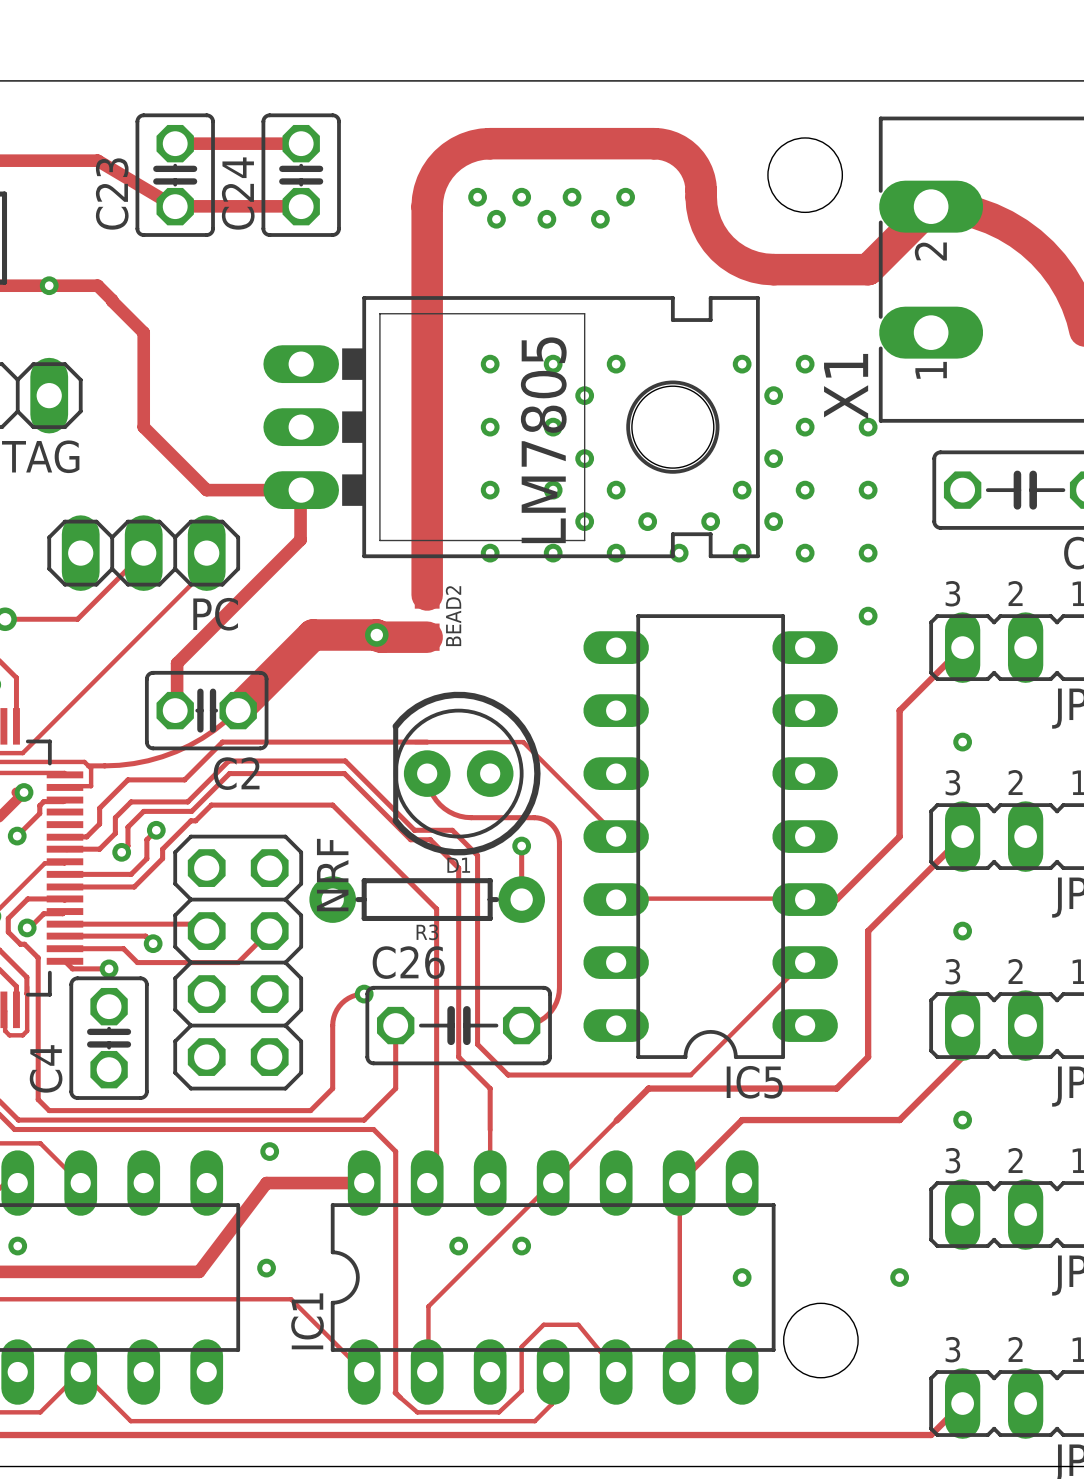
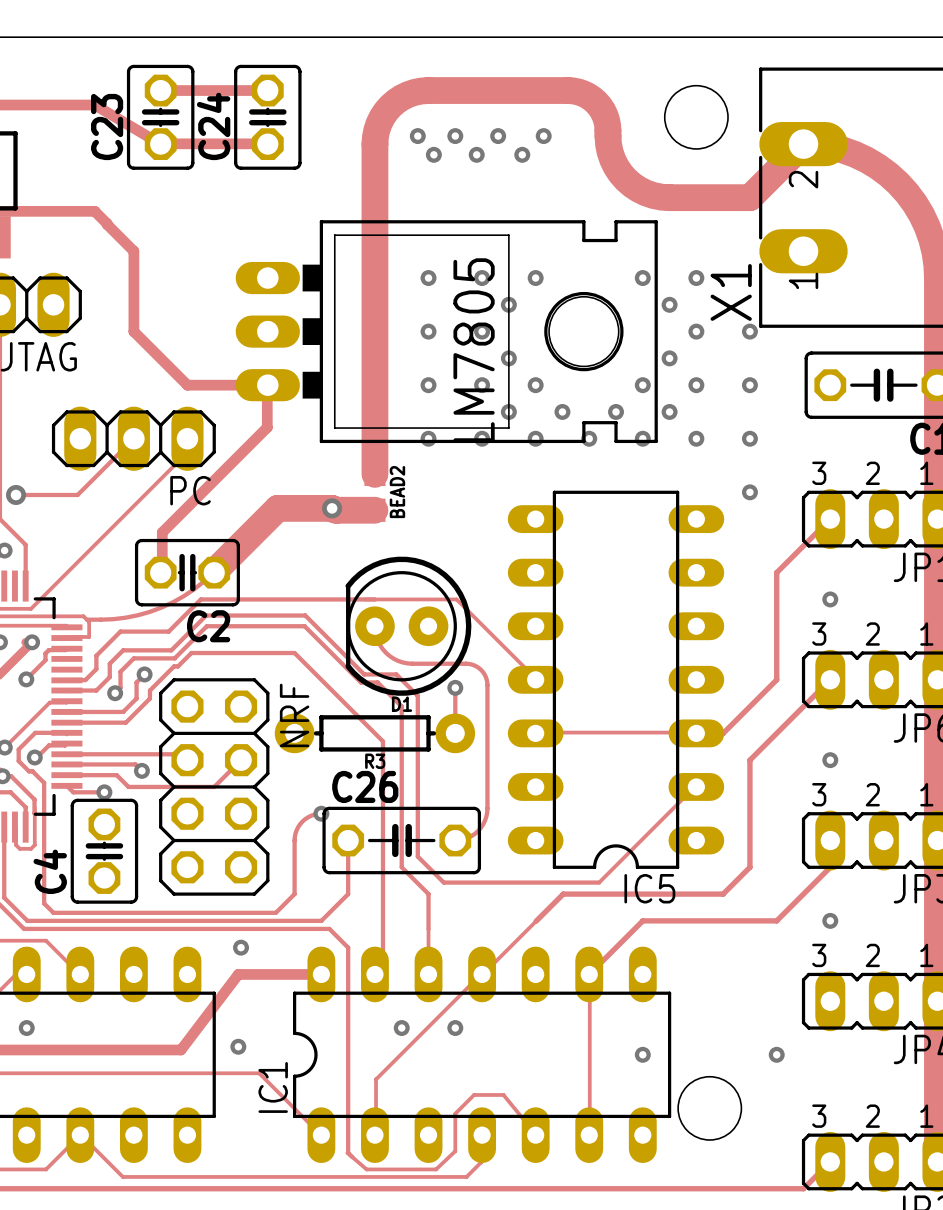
via: (49, 285) -> none

